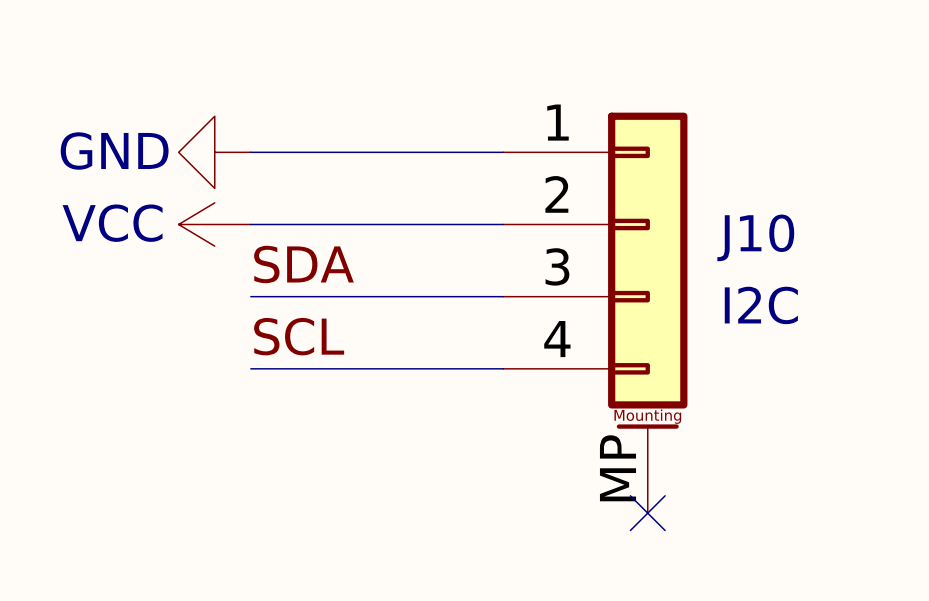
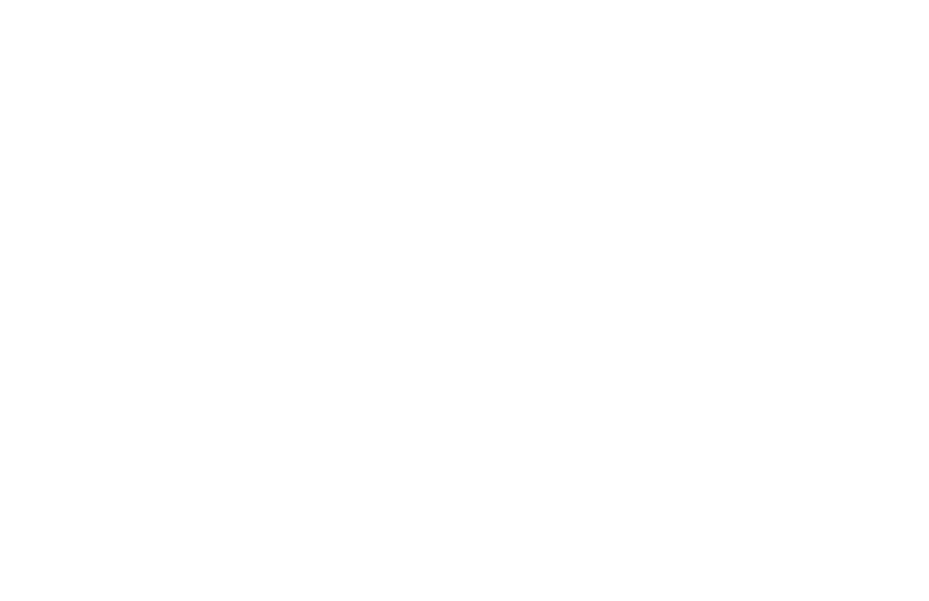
power symbol: GND (214, 152) -> none
wire: (250, 152) (503, 152) -> none
power symbol: VCC (214, 224) -> none
wire: (250, 224) (503, 224) -> none
label: SDA (303, 264) -> none
wire: (250, 296) (503, 296) -> none
J10: I2C (595, 312) -> none
label: SCL (299, 336) -> none
wire: (250, 368) (503, 368) -> none
no-connect mark: (647, 513) -> none

